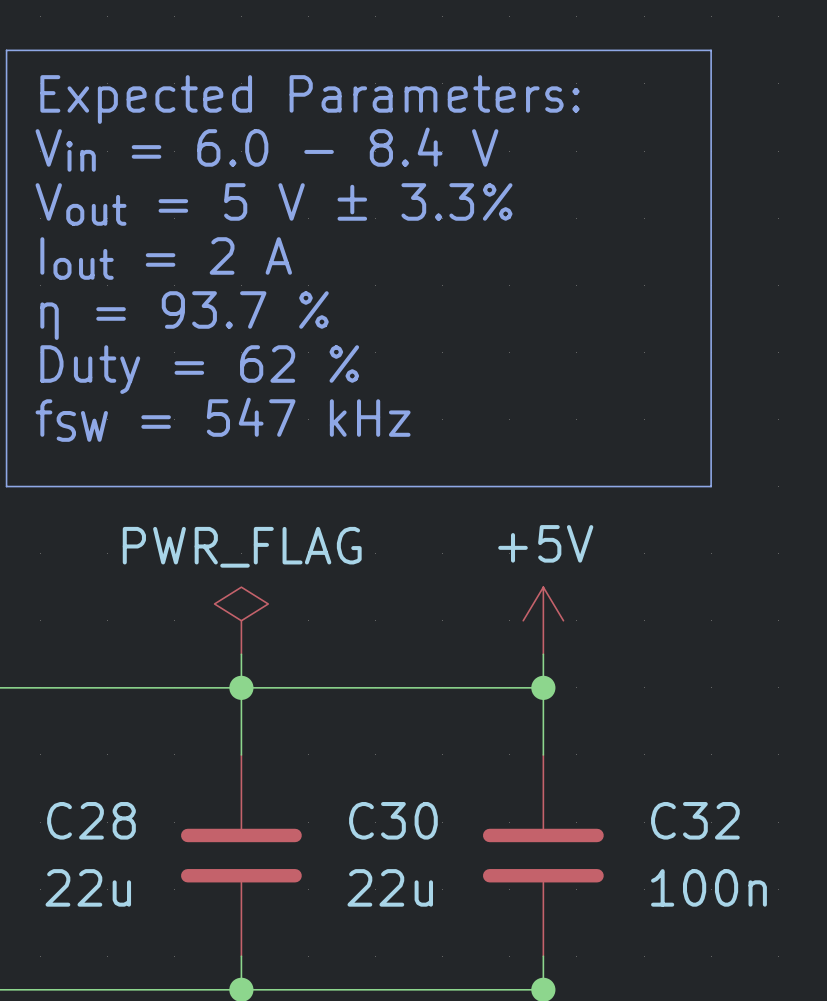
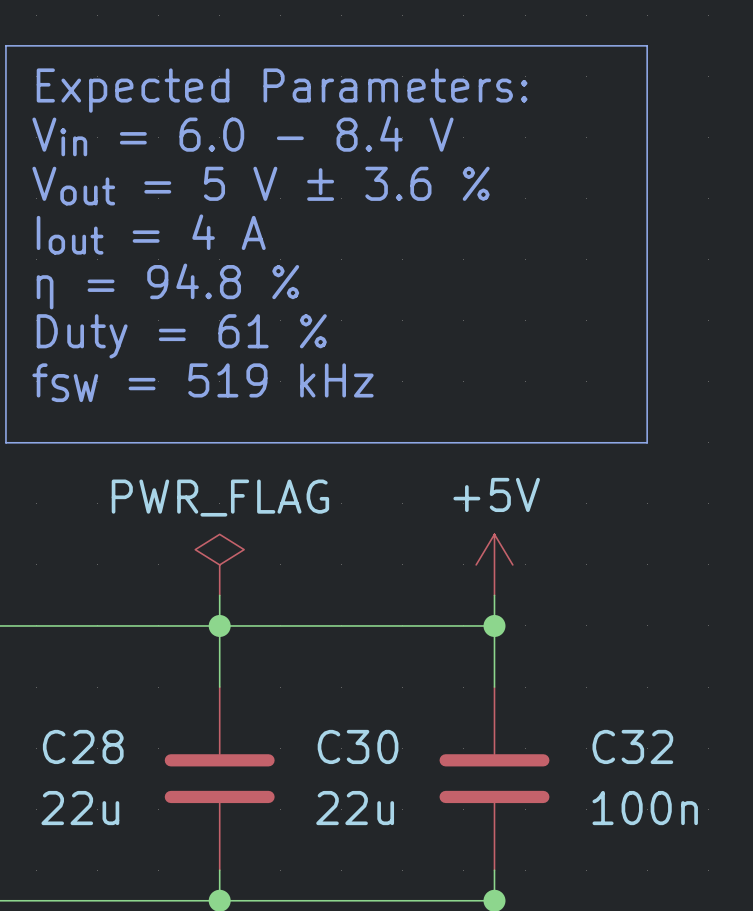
text: Vout = 5 V ± 3.3% (274, 204) -> Vout = 5 V ± 3.6 % (261, 186)
text: Iout = 2 A (166, 258) -> Iout = 4 A (151, 234)
text: η = 93.7 % (184, 315) -> η = 94.8 % (167, 286)
text: Duty = 62 % (199, 369) -> Duty = 61 % (181, 336)
text: fSW = 547 kHz (223, 419) -> fSW = 519 kHz (202, 382)

